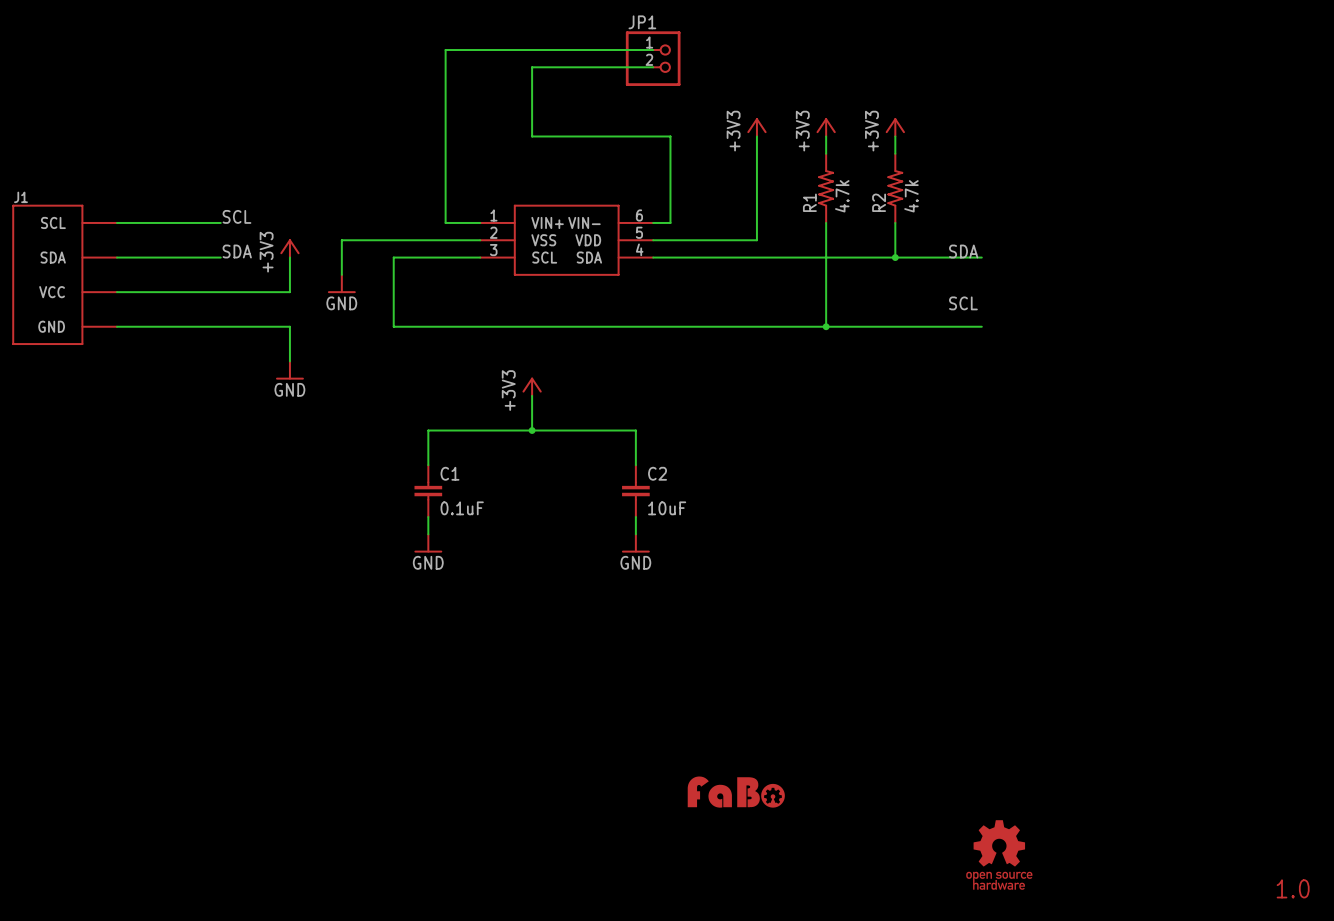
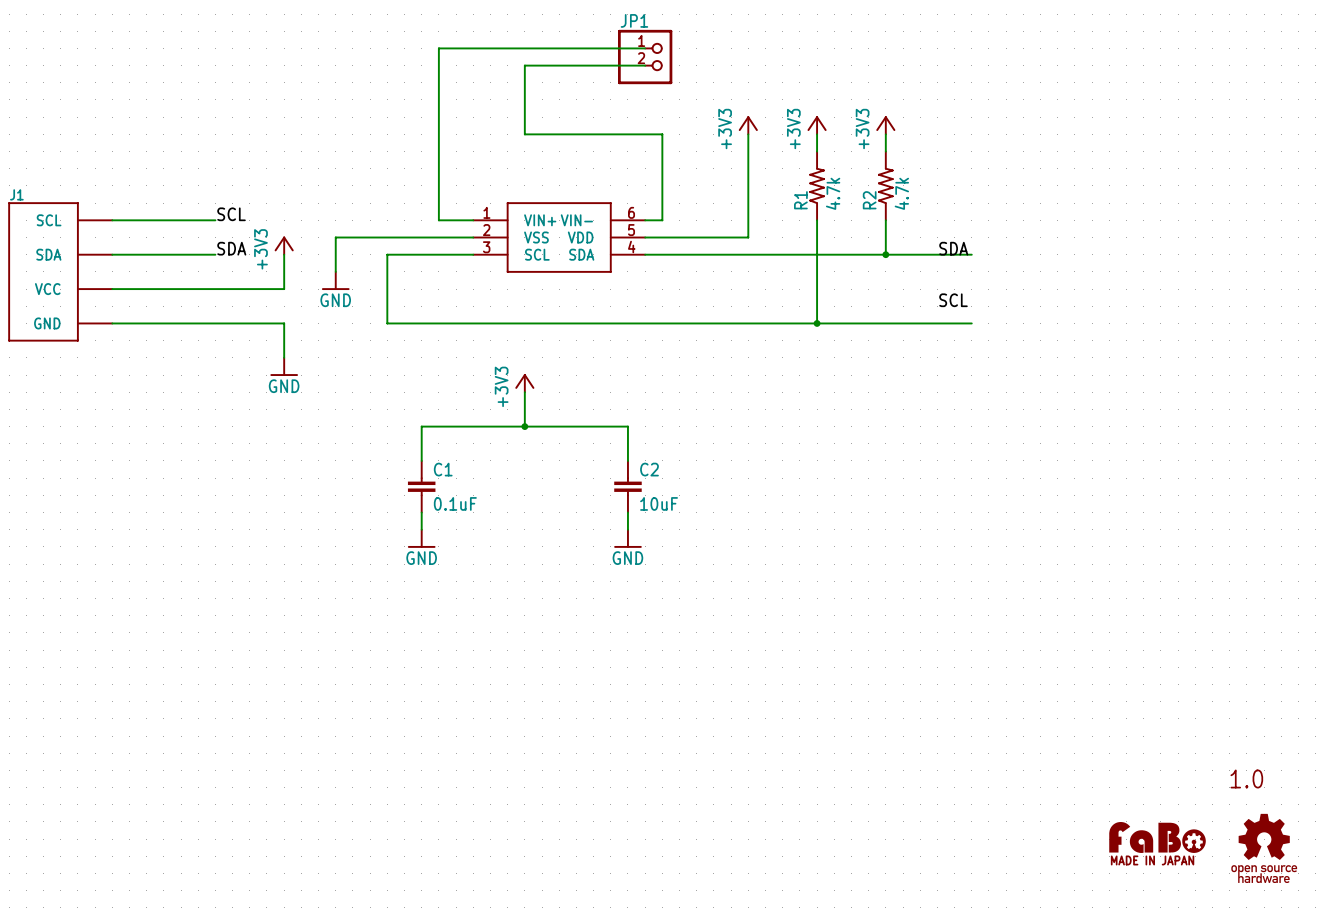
part: (736, 792) -> none
part: none -> (1157, 837)
part: (999, 854) -> none
part: none -> (1264, 848)
text position: 1.0 (1293, 888) -> 1.0 (1246, 778)

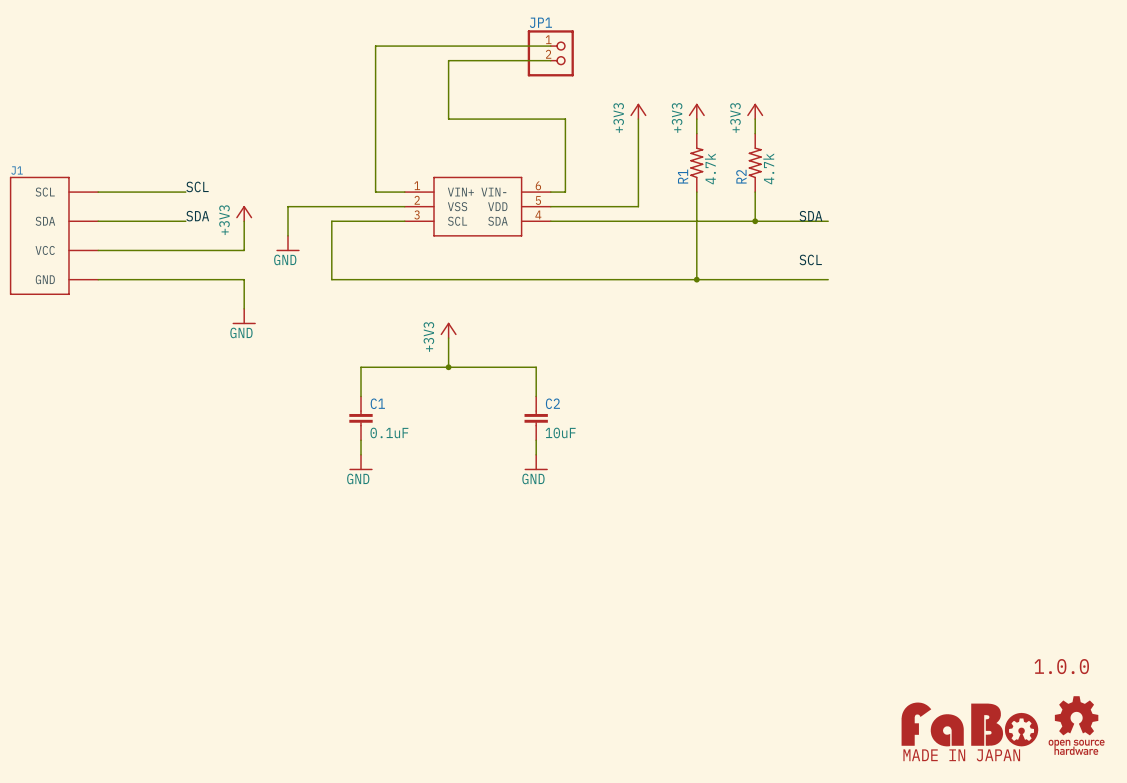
text: 1.0 (1246, 778) -> 1.0.0 (1061, 666)
part: (1157, 837) -> none
part: none -> (969, 724)

